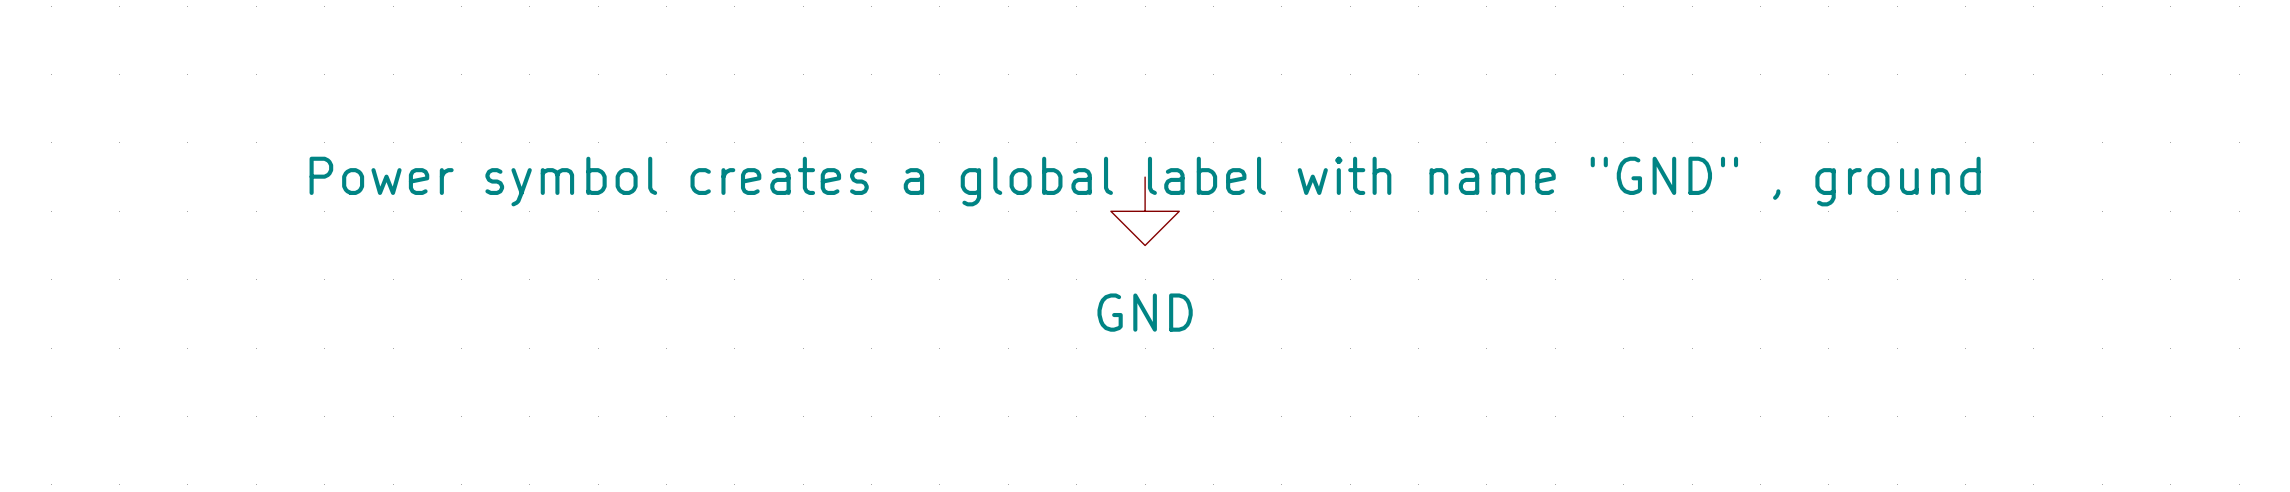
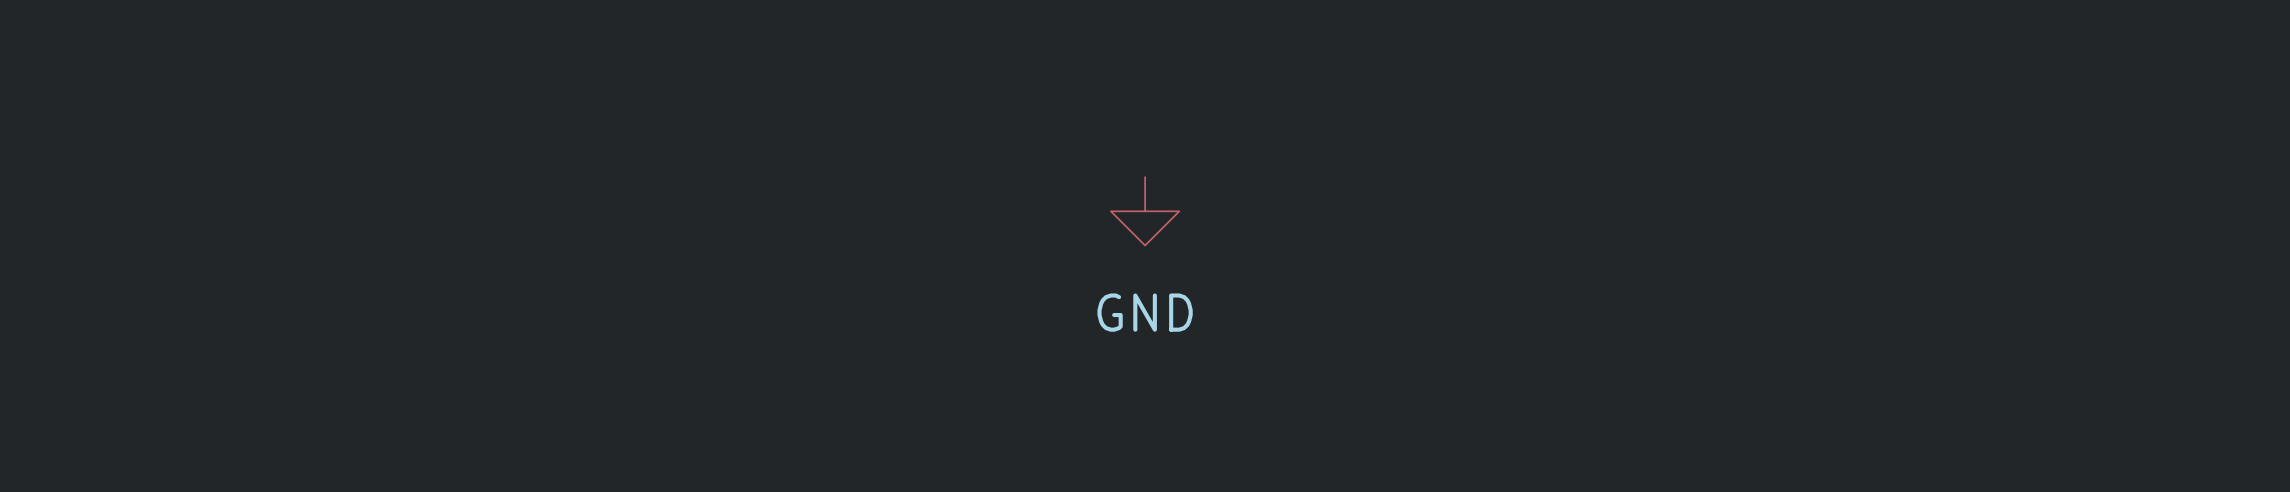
power symbol text: Power symbol creates a global label with name "GND" , ground (1145, 181) -> none

